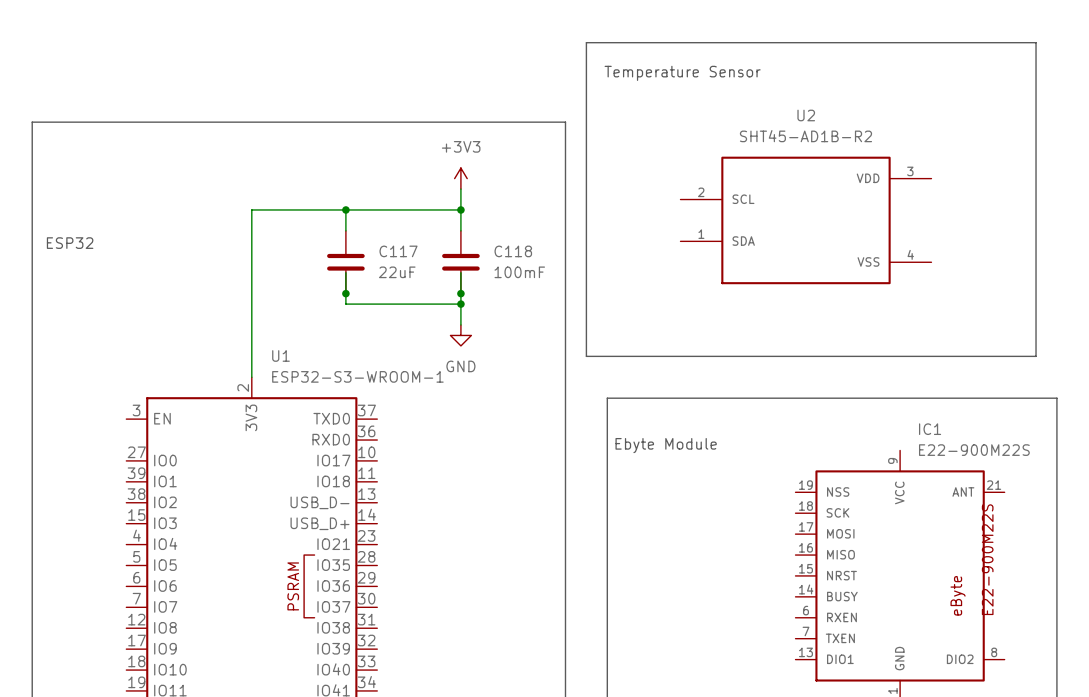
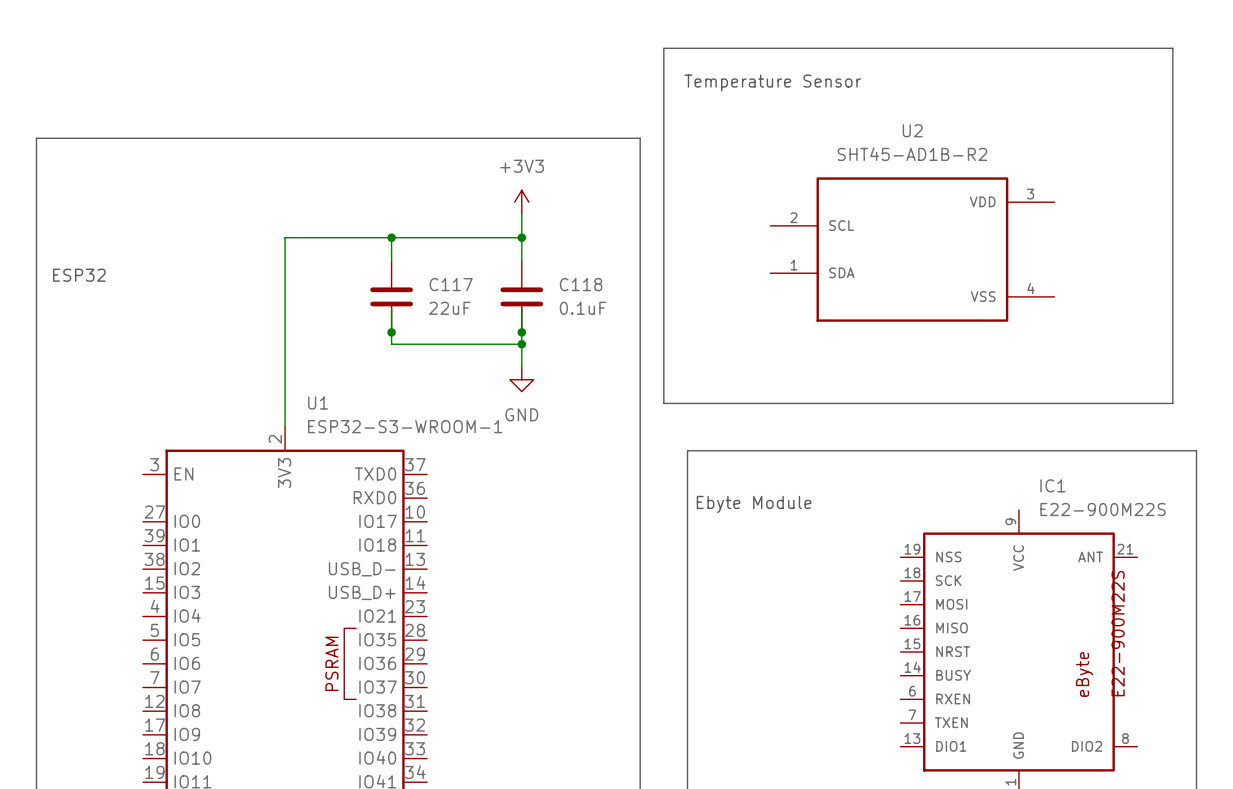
C118 value: 100mF (519, 272) -> 0.1uF (583, 308)

